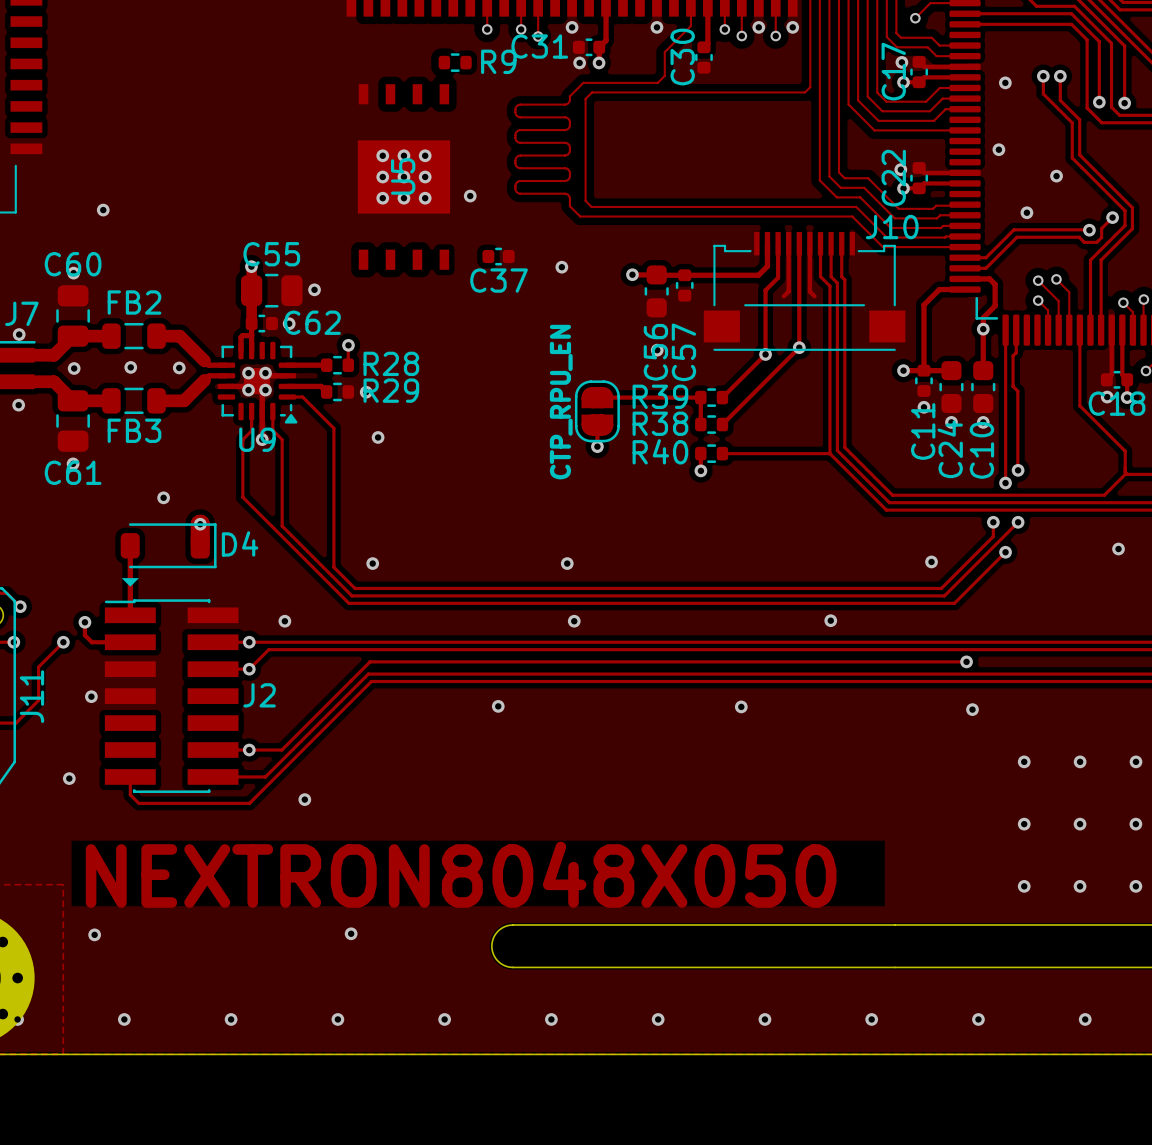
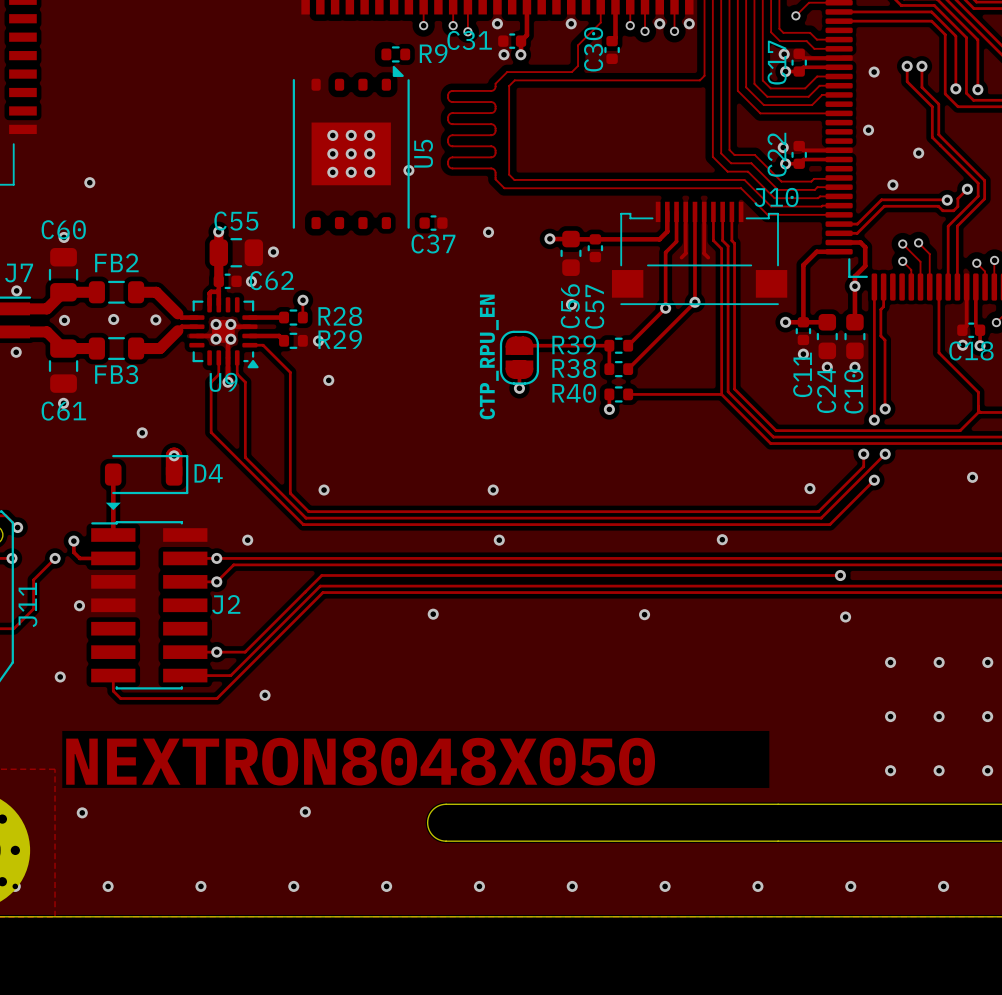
U5 footprint: [357, 84, 451, 270] -> [292, 65, 410, 230]
U5 name position: U5 (403, 176) -> U5 (423, 153)

